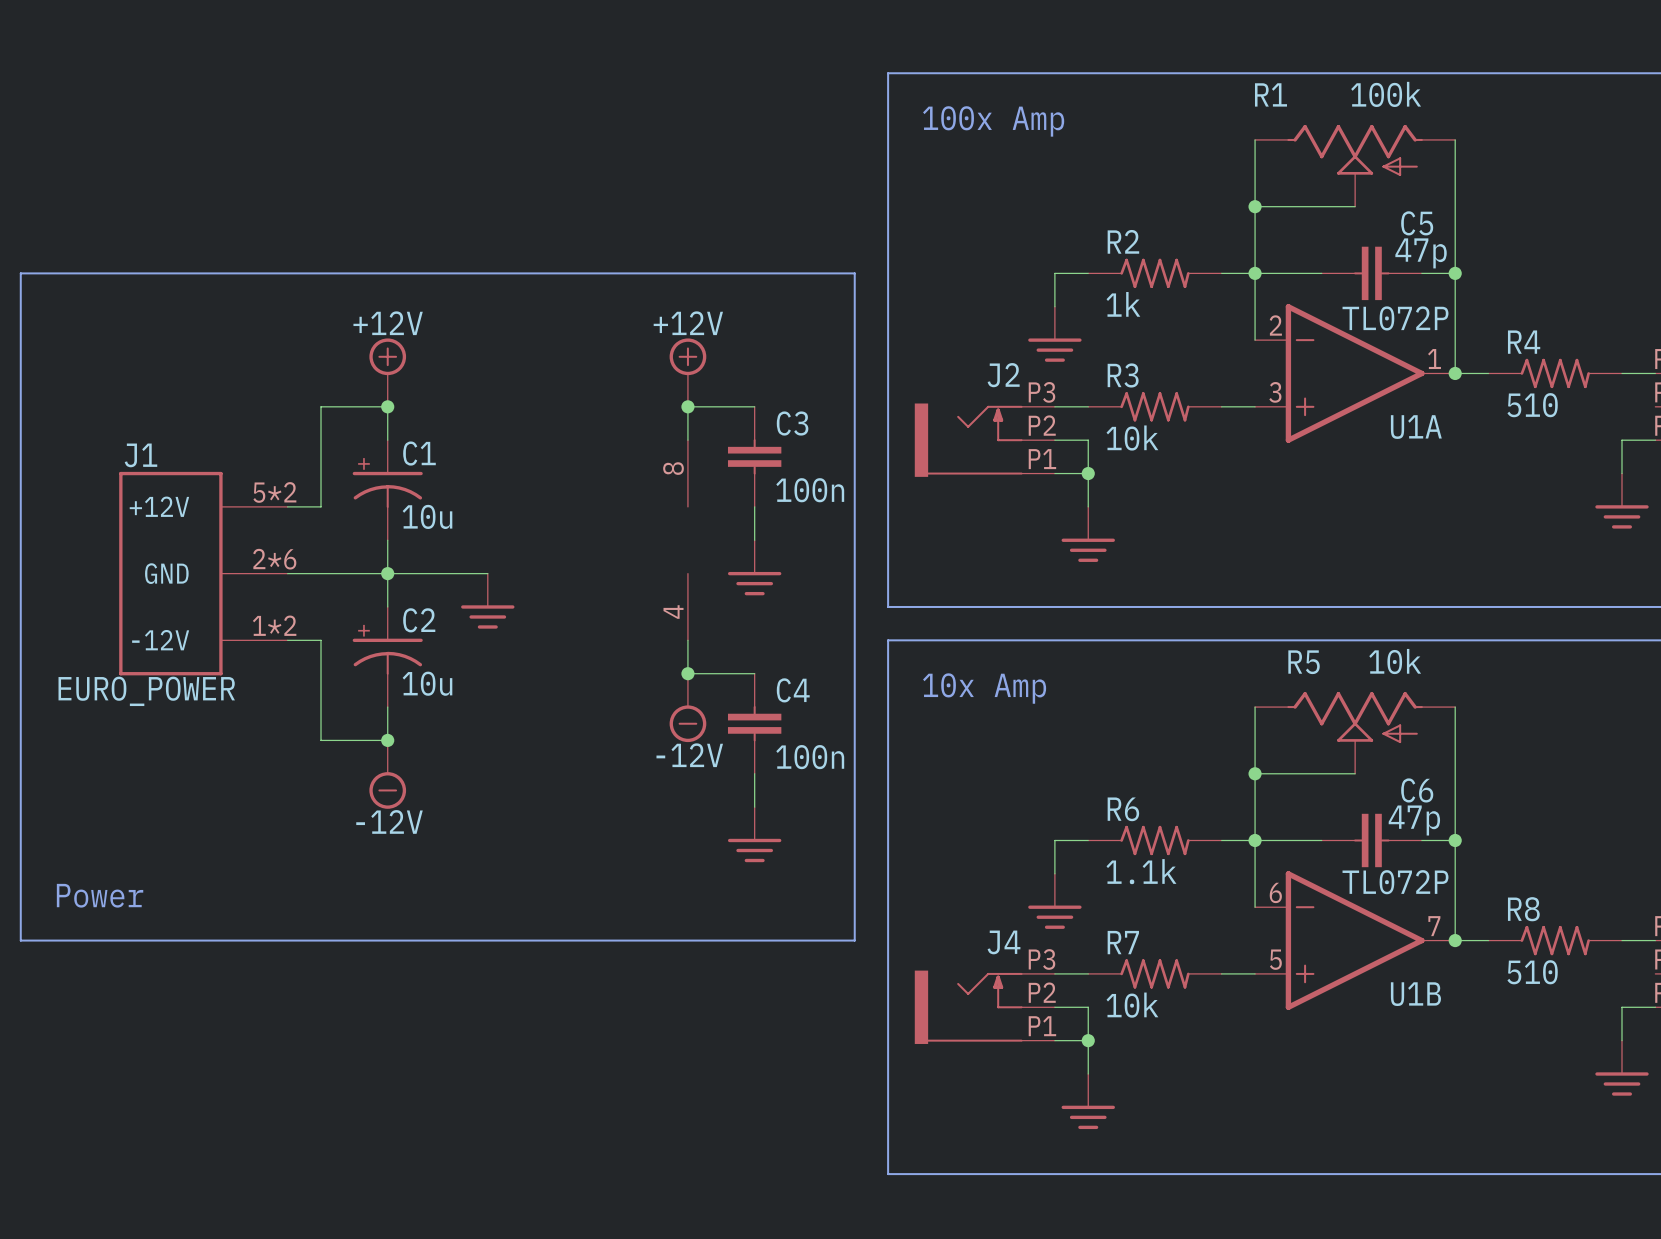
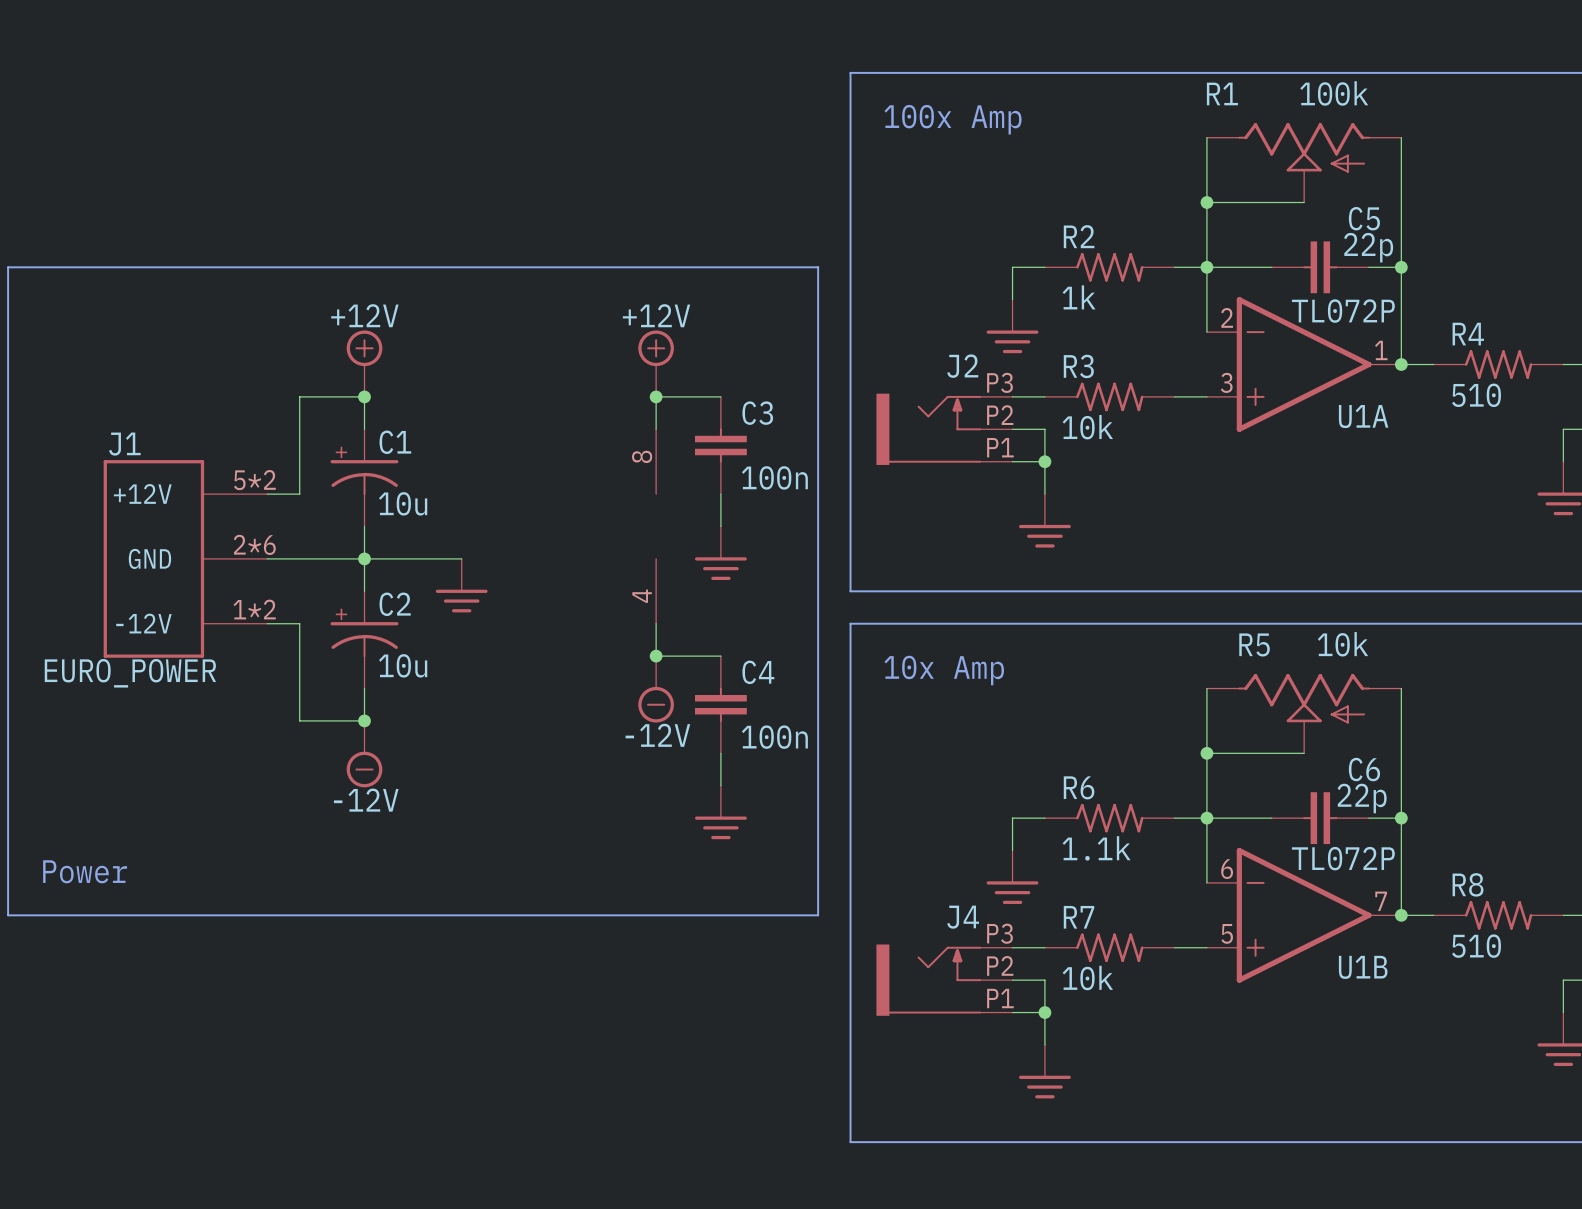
C5 value: 47p (1421, 253) -> 22p (1368, 247)
C6 value: 47p (1414, 820) -> 22p (1362, 798)

